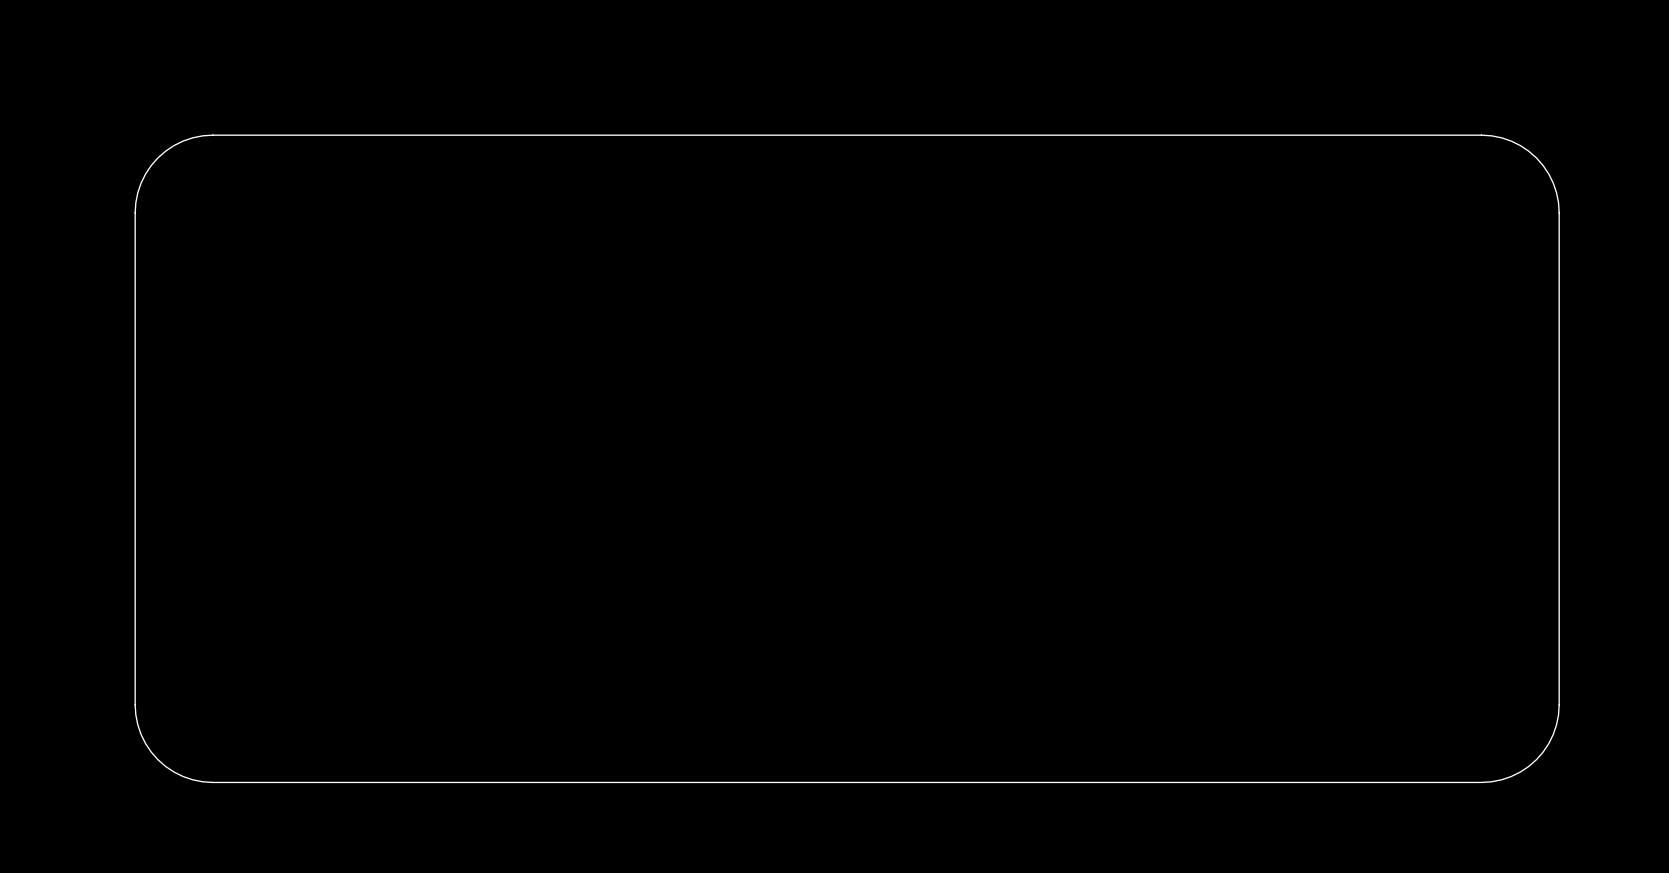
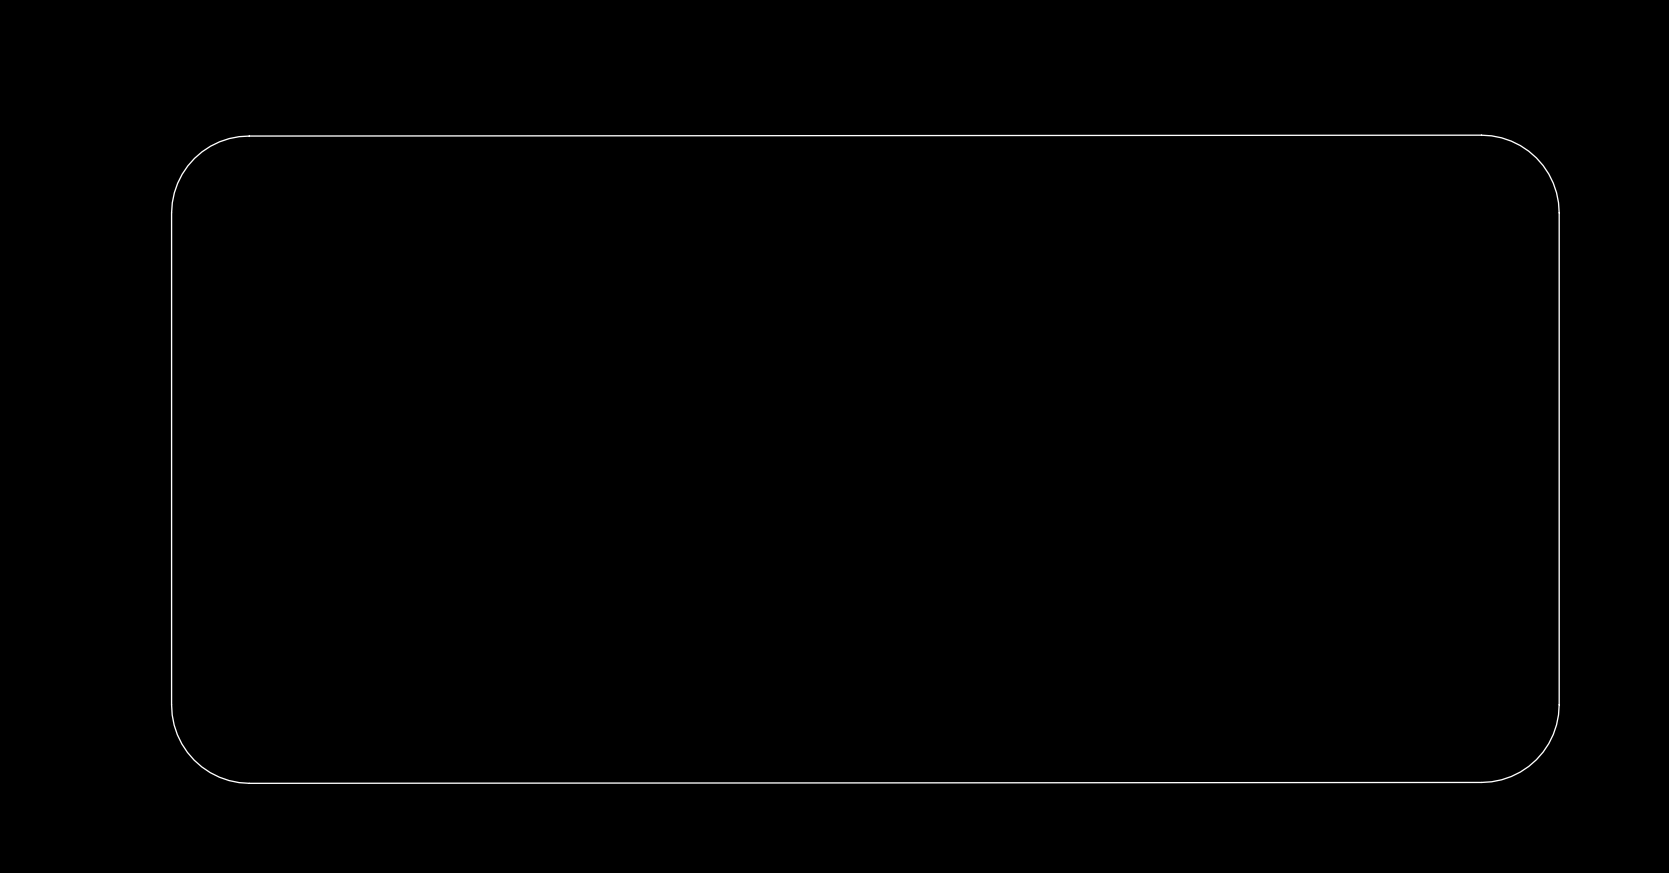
board edge: (1481, 135) (212, 135) (183, 141) (157, 157) (141, 183) (135, 212) (135, 714) (141, 734) (151, 752) (165, 766) (183, 776) (212, 782) (1481, 782) -> (1481, 135) (249, 136) (219, 141) (194, 158) (177, 183) (171, 212) (172, 714) (177, 734) (187, 752) (201, 766) (219, 777) (249, 783) (1481, 782)

